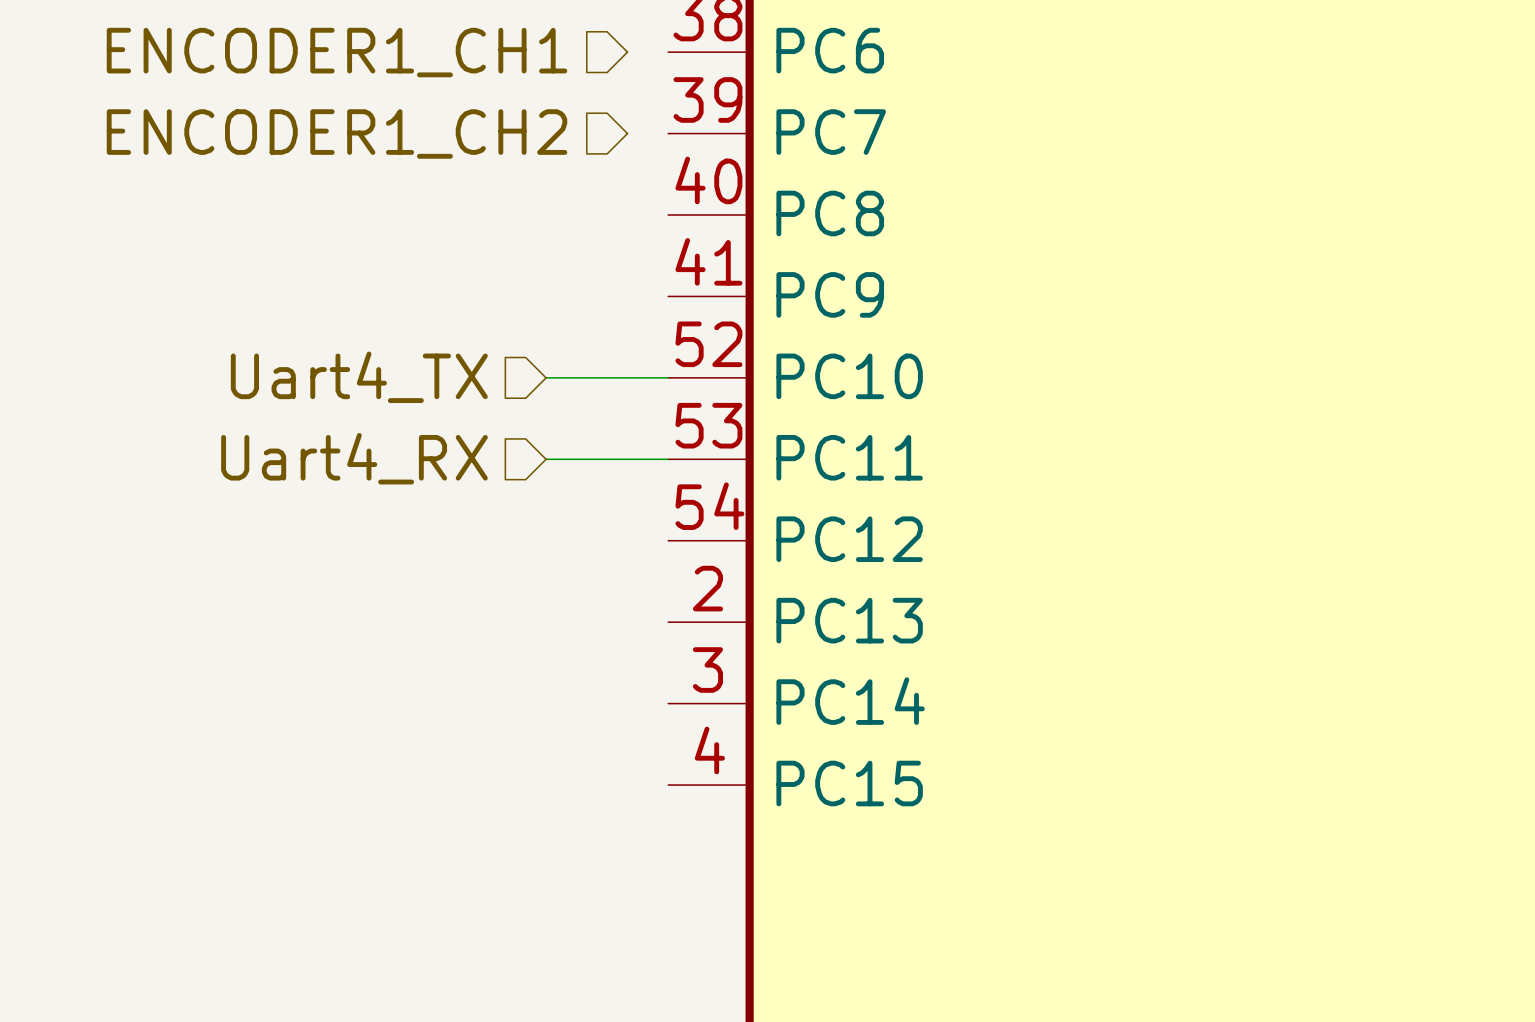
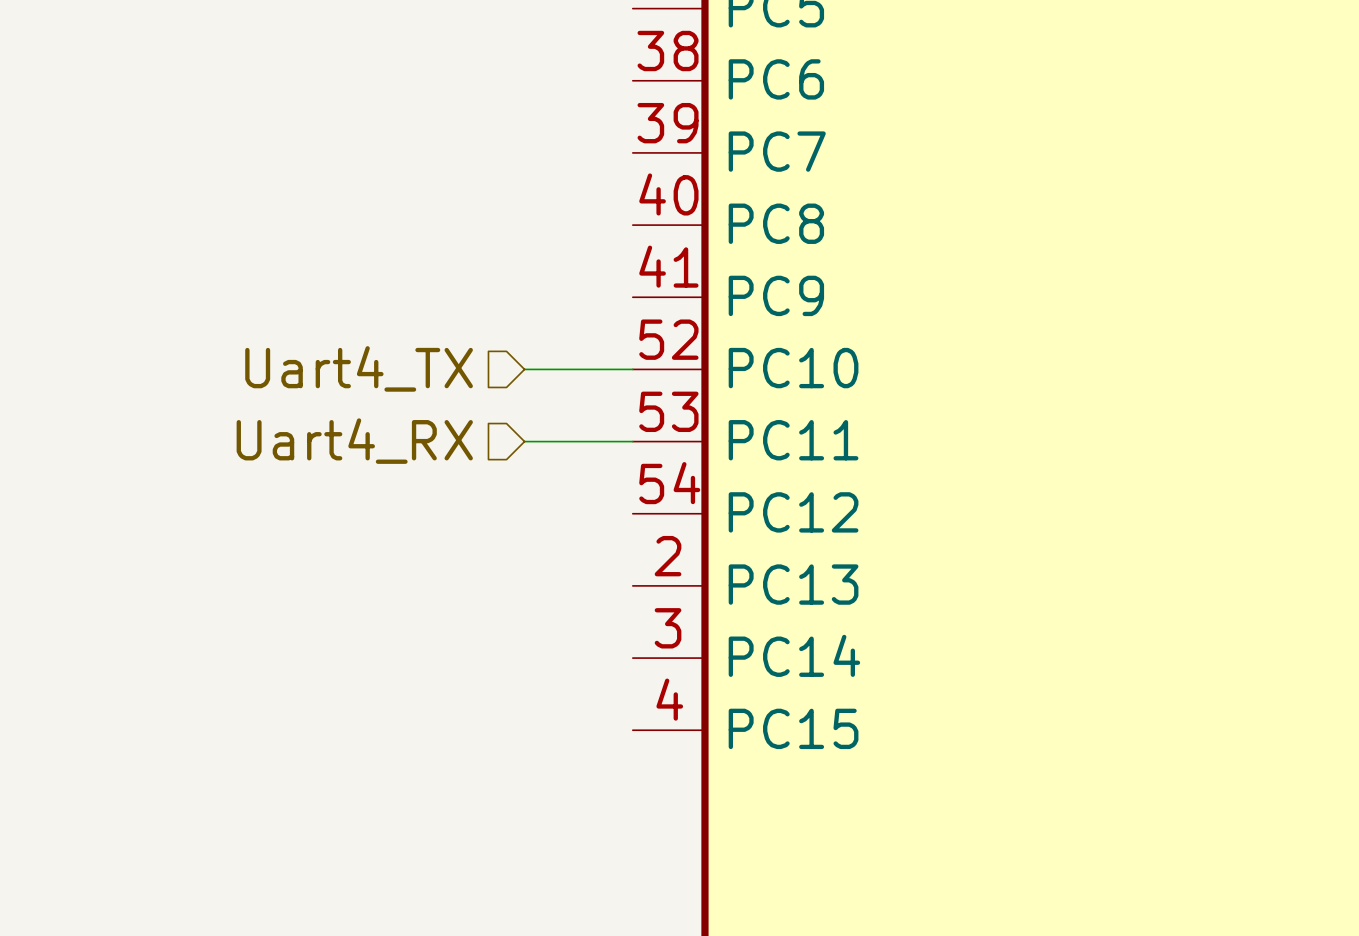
hierarchical label: ENCODER1_CH1 (337, 52) -> none
hierarchical label: ENCODER1_CH2 (337, 133) -> none

